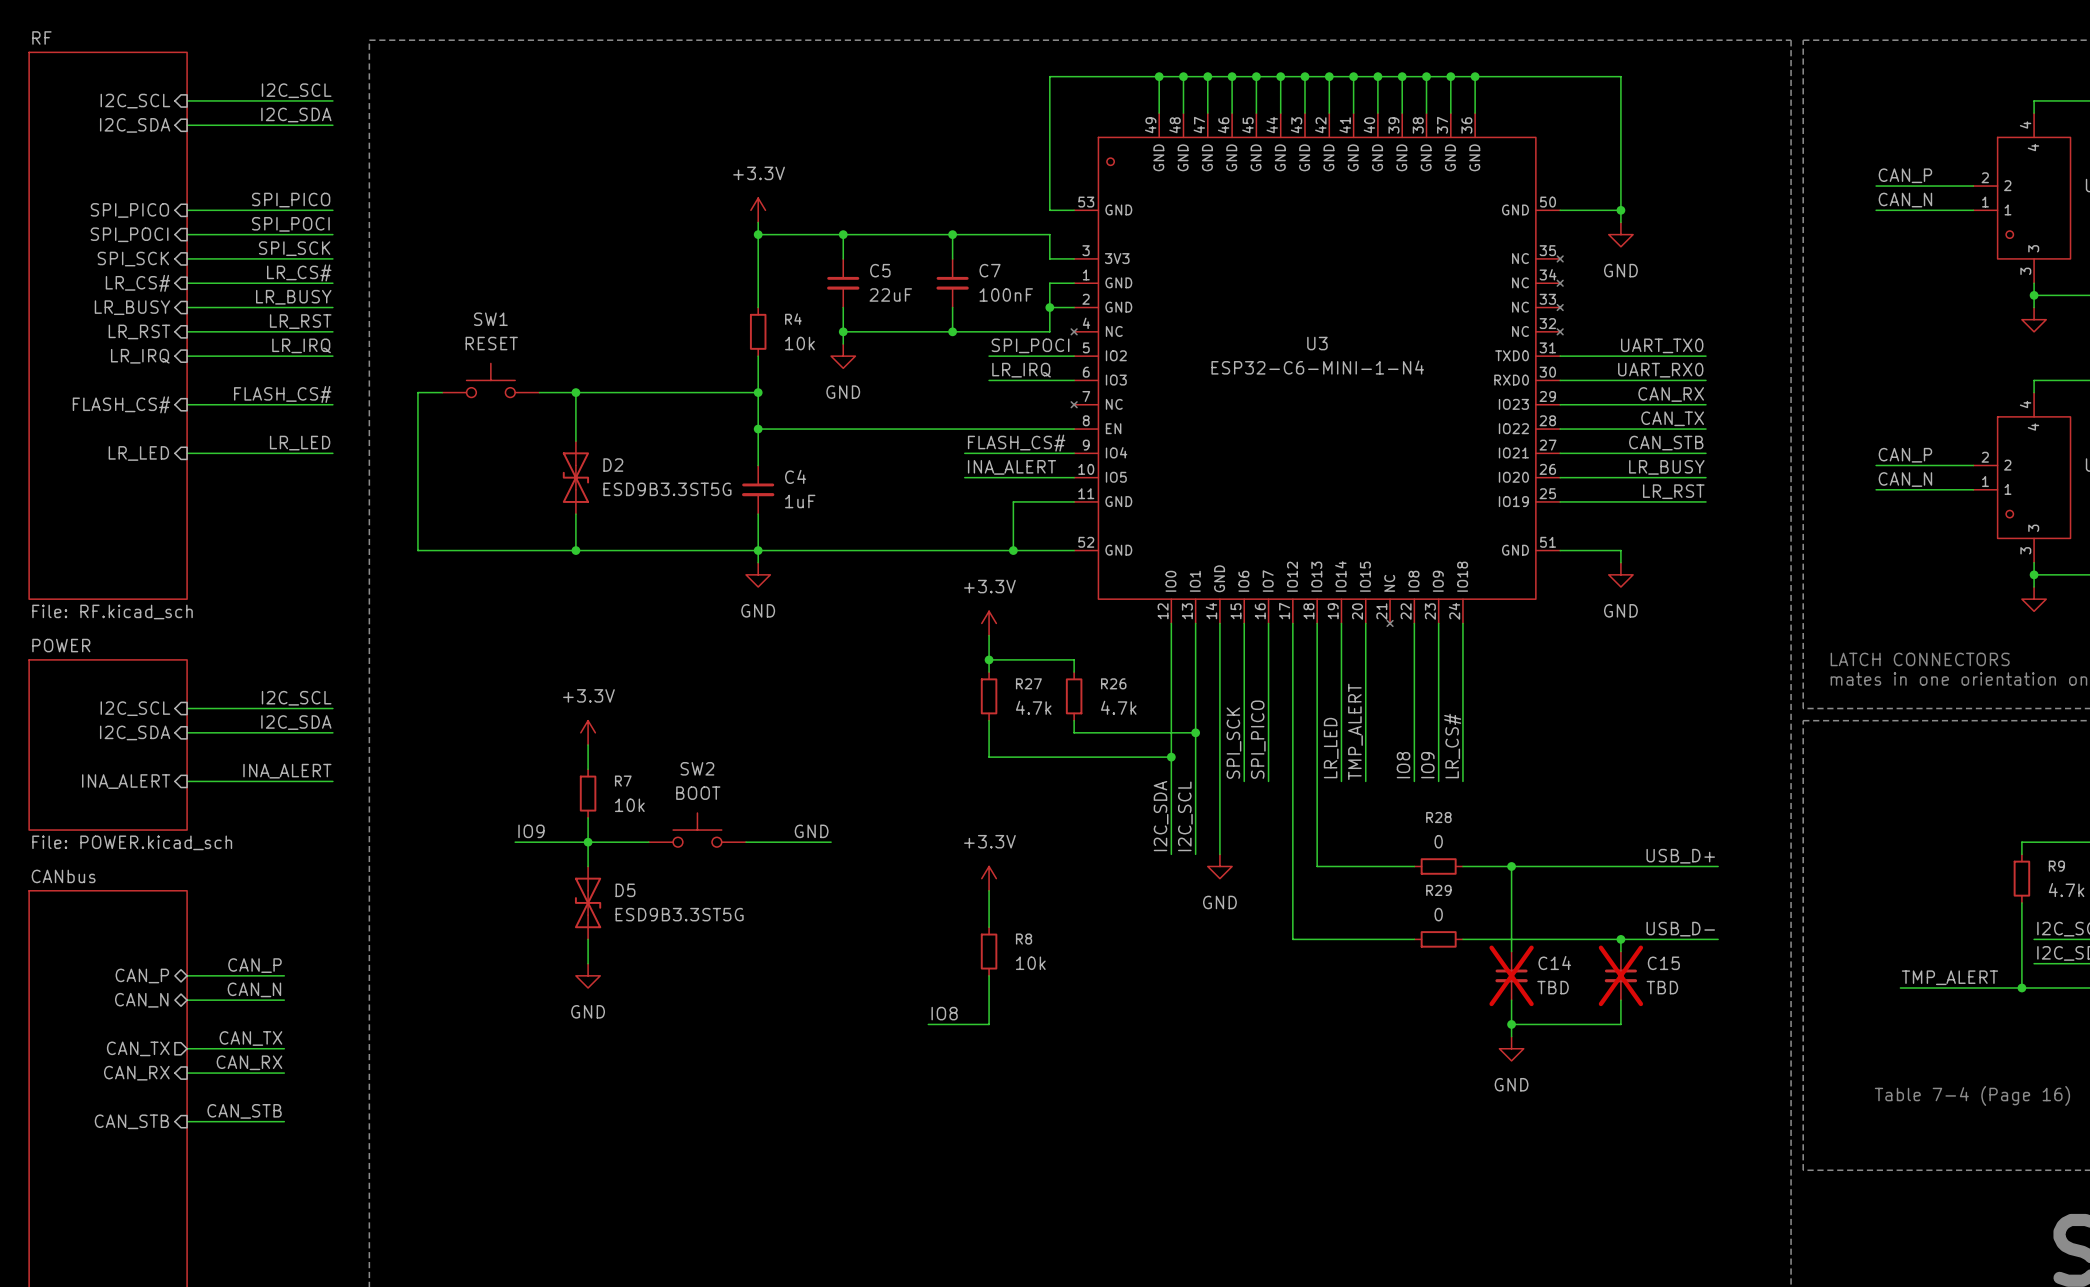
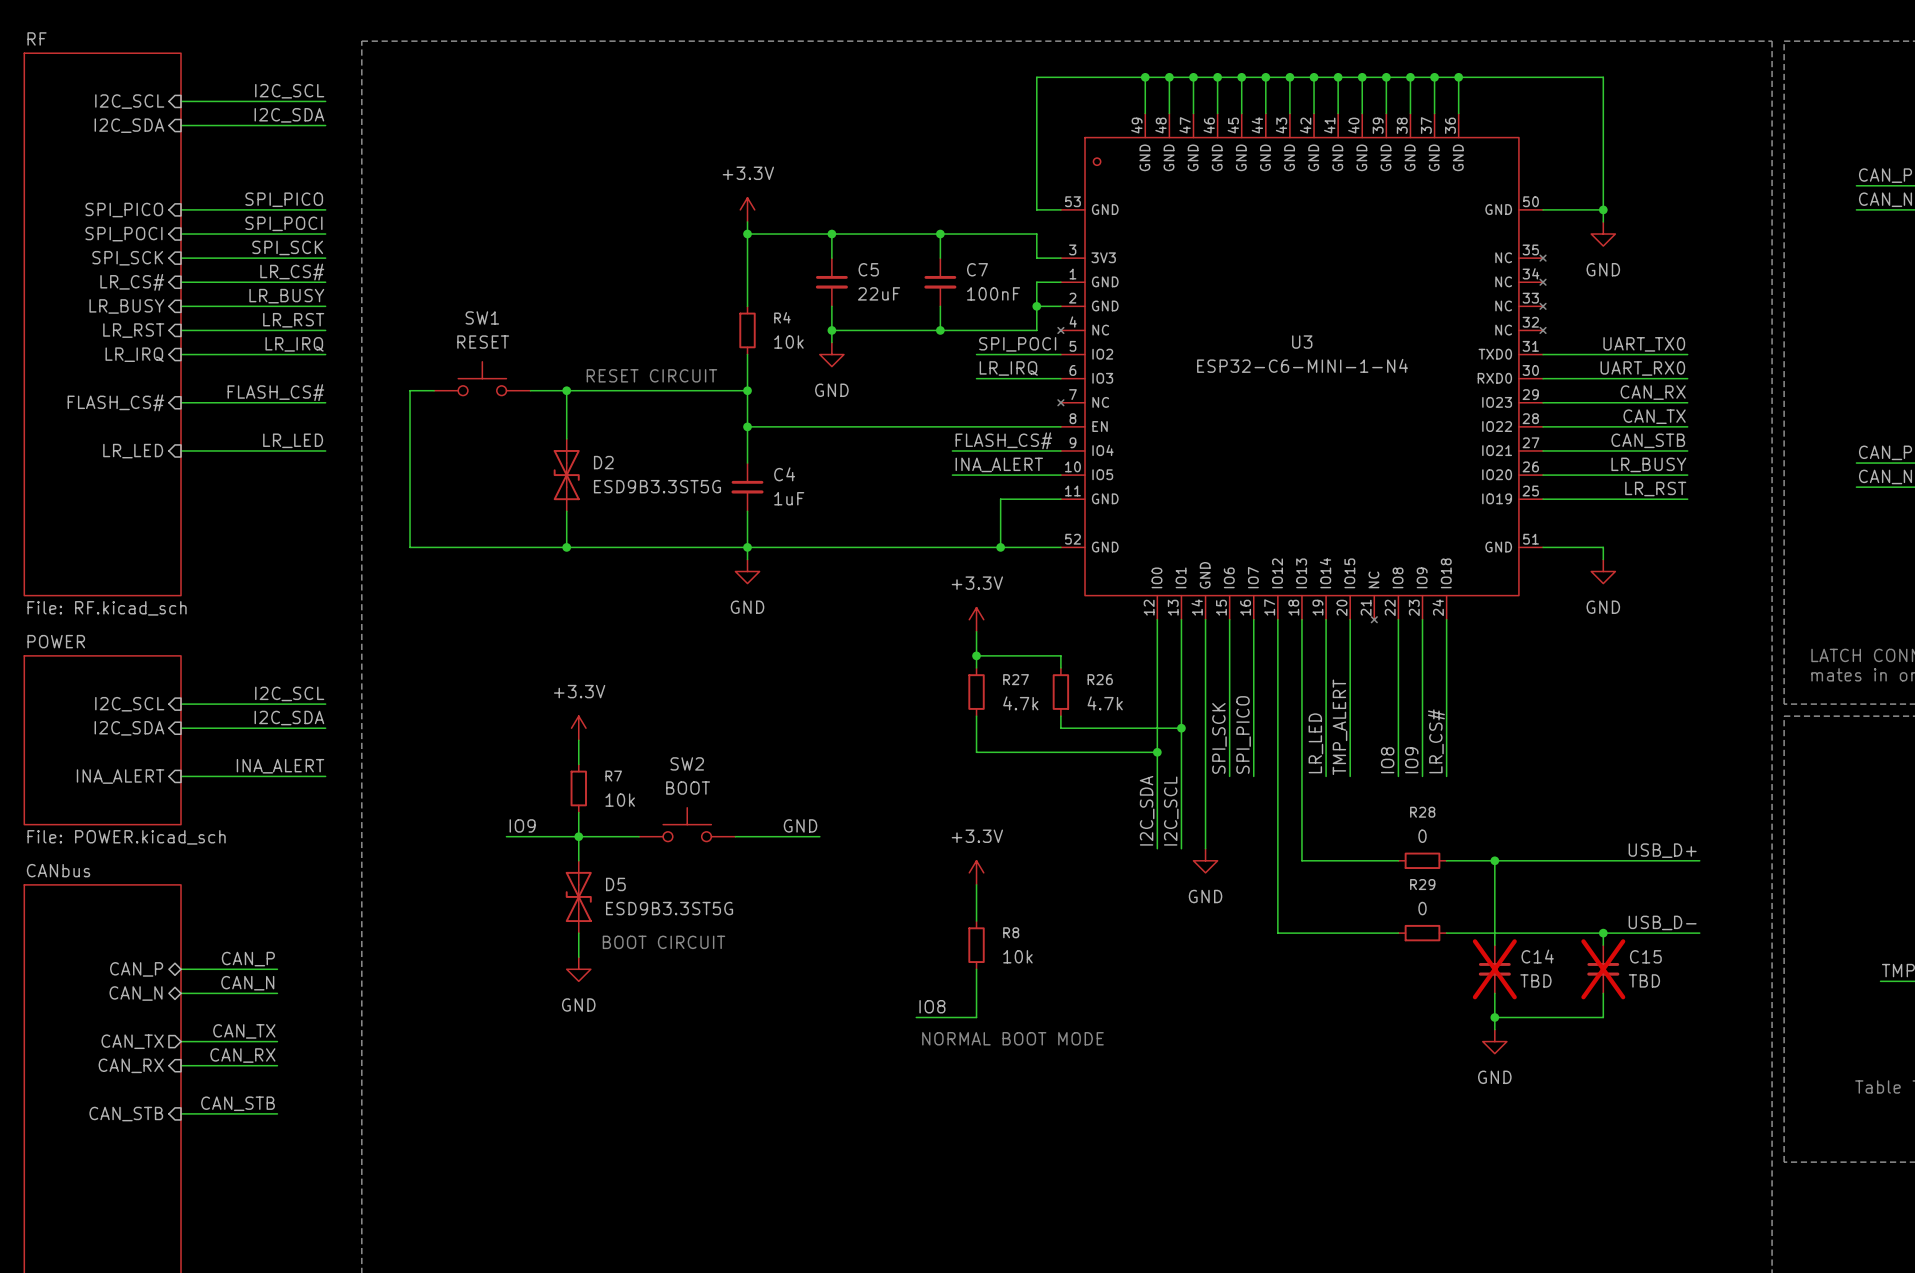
text: none -> RESET CIRCUIT (651, 375)
text: none -> BOOT CIRCUIT (664, 942)
text: none -> NORMAL BOOT MODE (1012, 1038)

